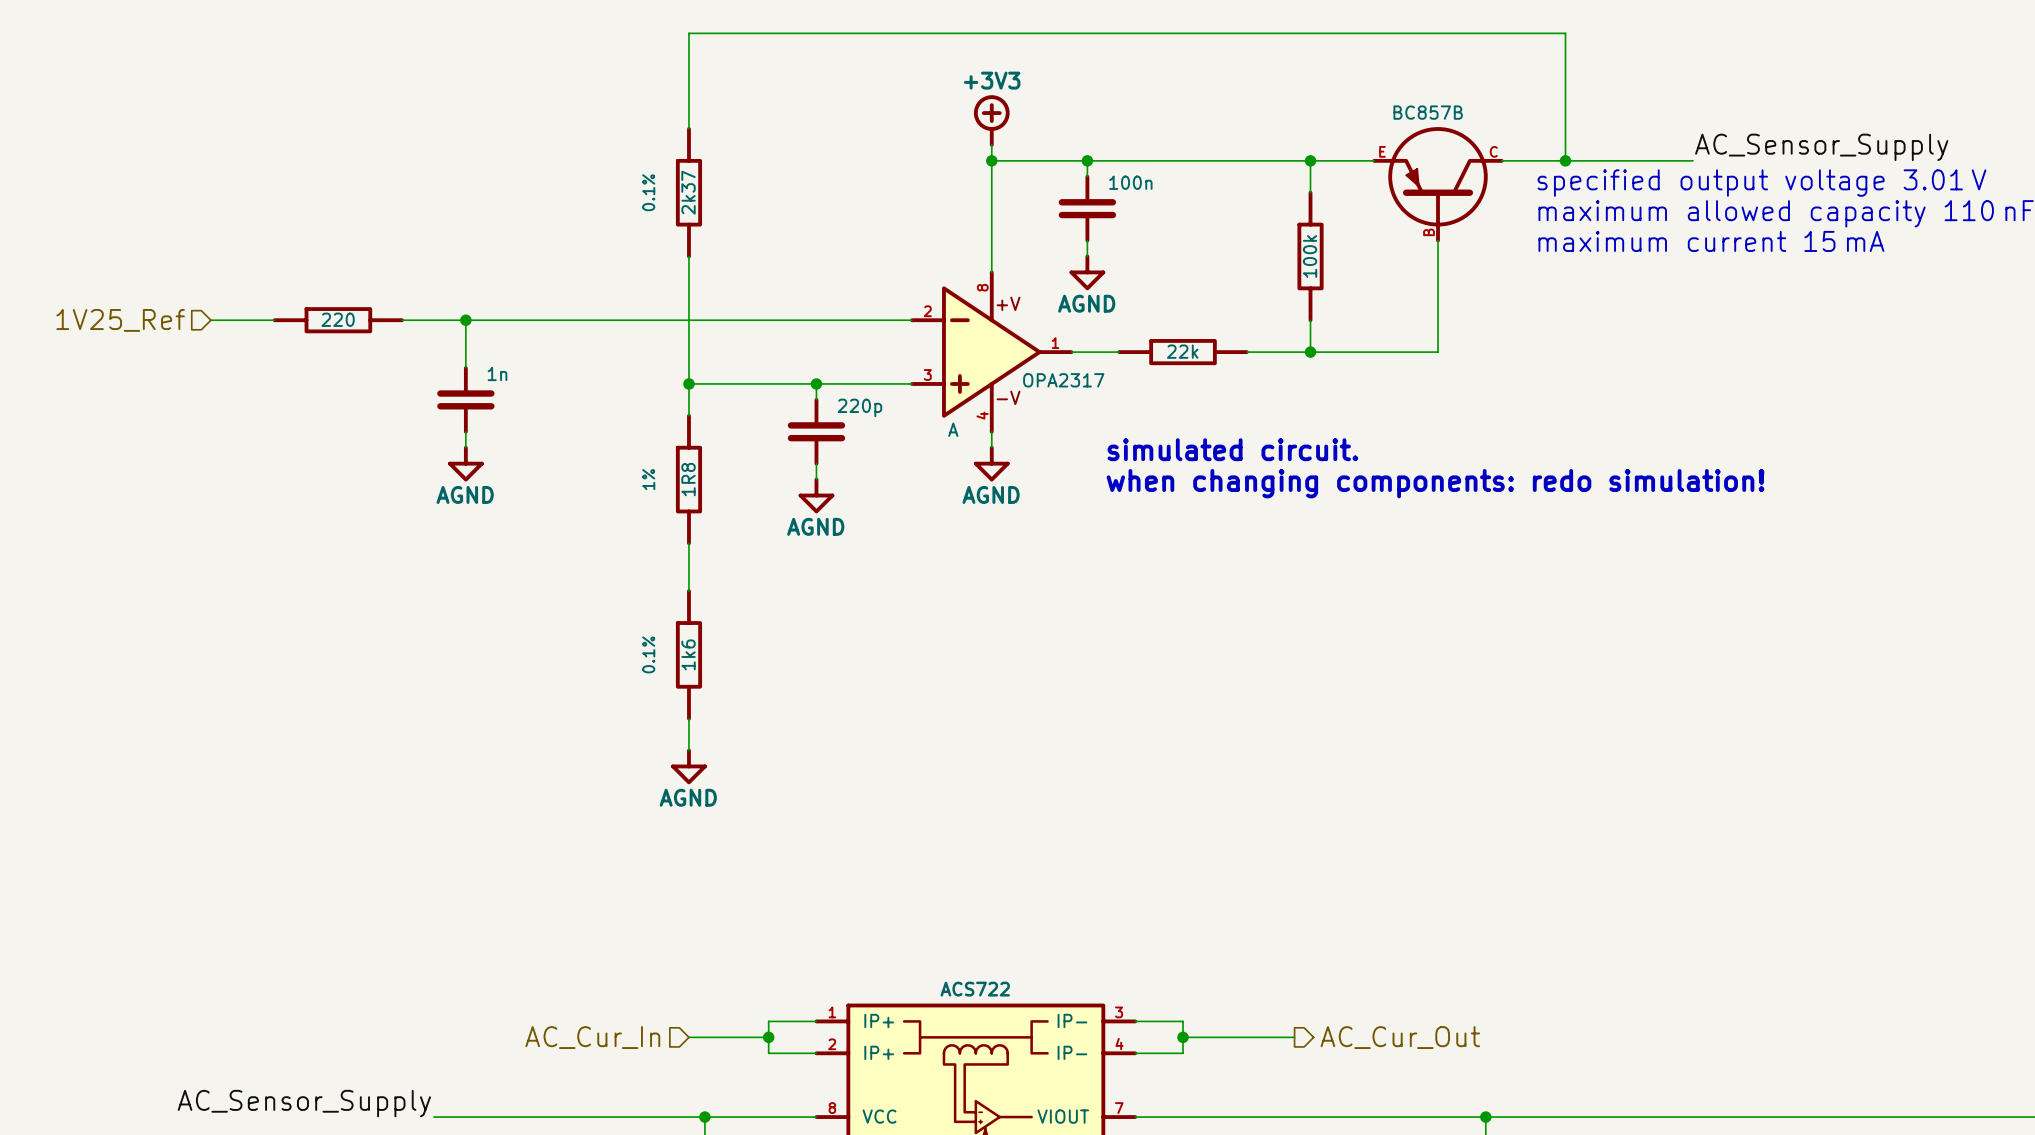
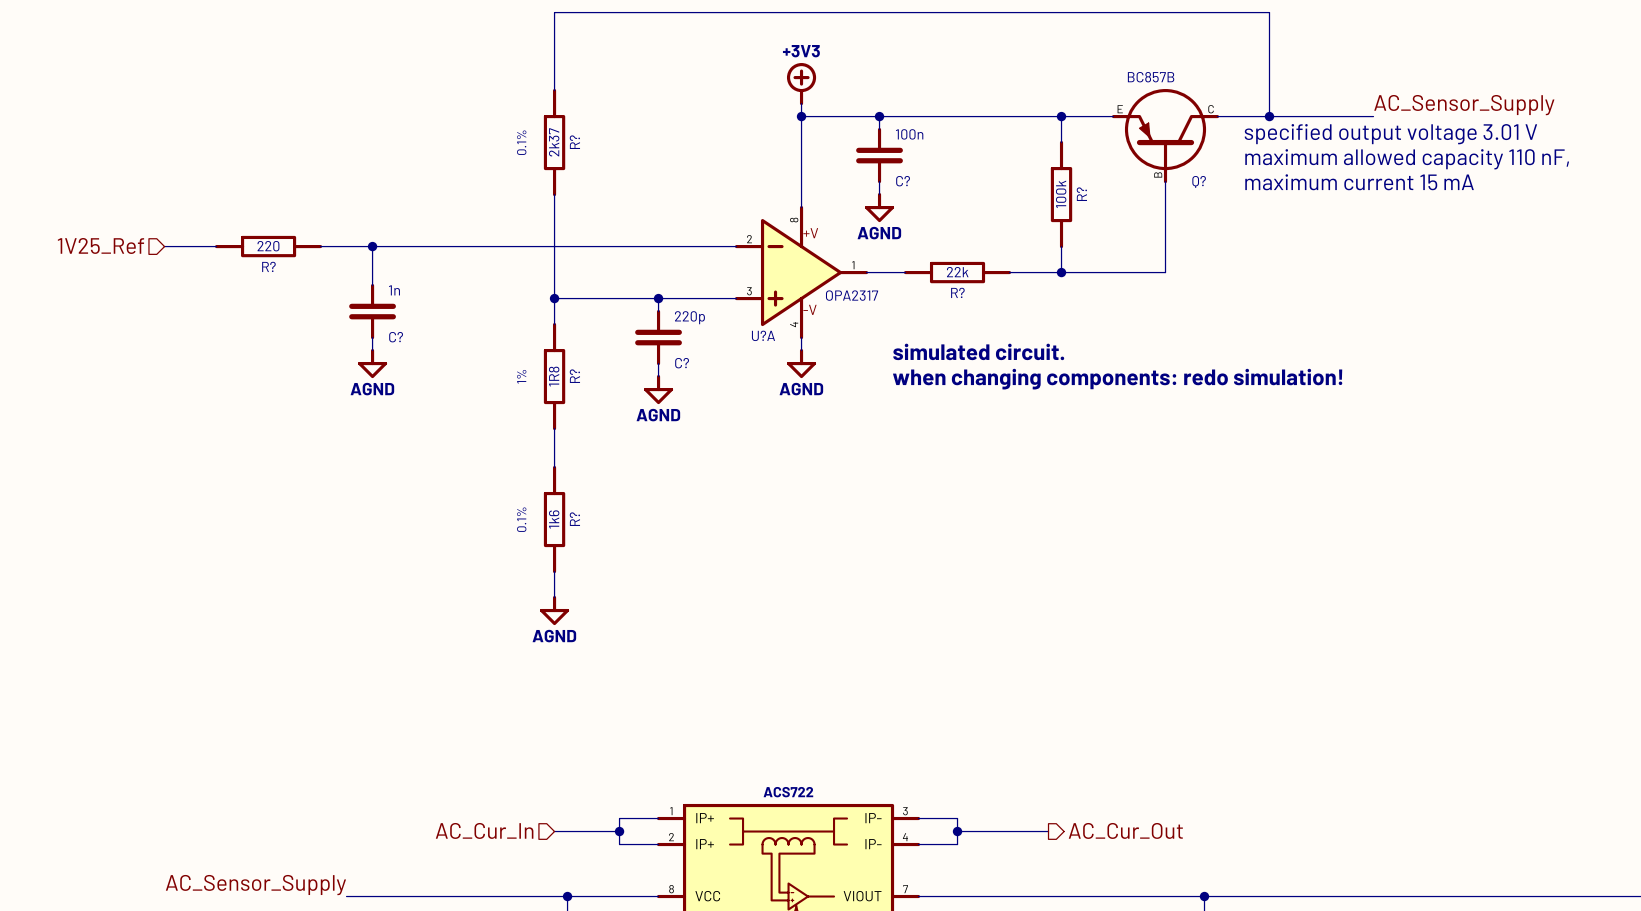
R? name: none -> R? (574, 142)
C? name: none -> C? (903, 181)
Q? name: none -> Q? (1199, 181)
R? name: none -> R? (1081, 194)
R? name: none -> R? (268, 266)
R? name: none -> R? (957, 292)
A name: A (953, 429) -> U?A (763, 335)
C? name: none -> C? (396, 337)
C? name: none -> C? (682, 363)
R? name: none -> R? (574, 376)
R? name: none -> R? (574, 519)

